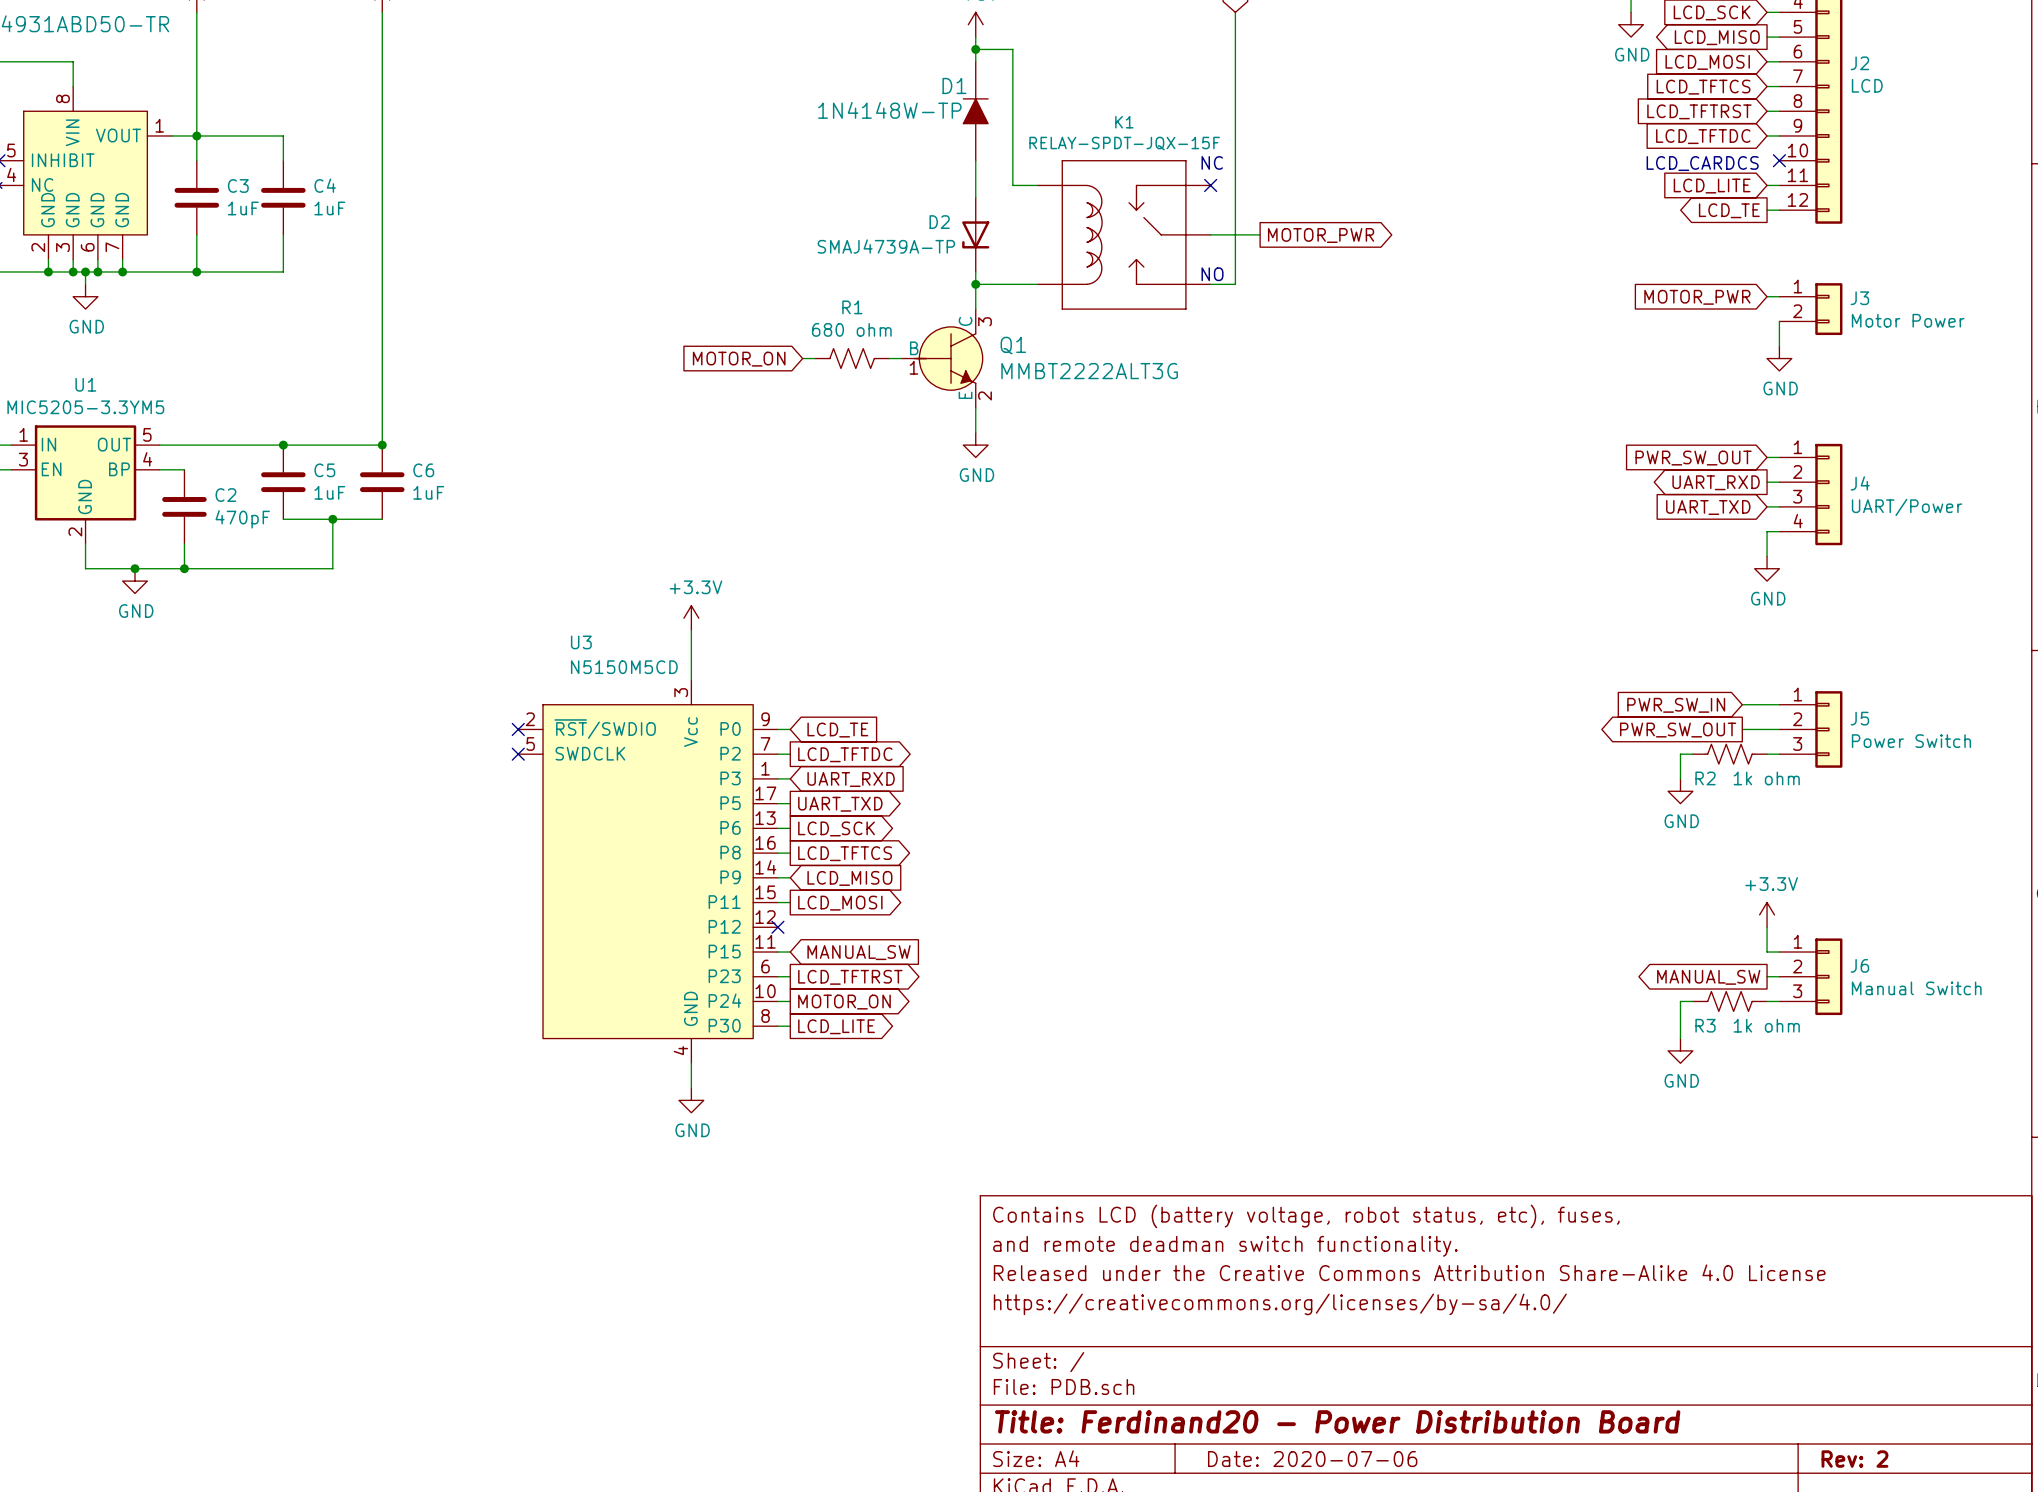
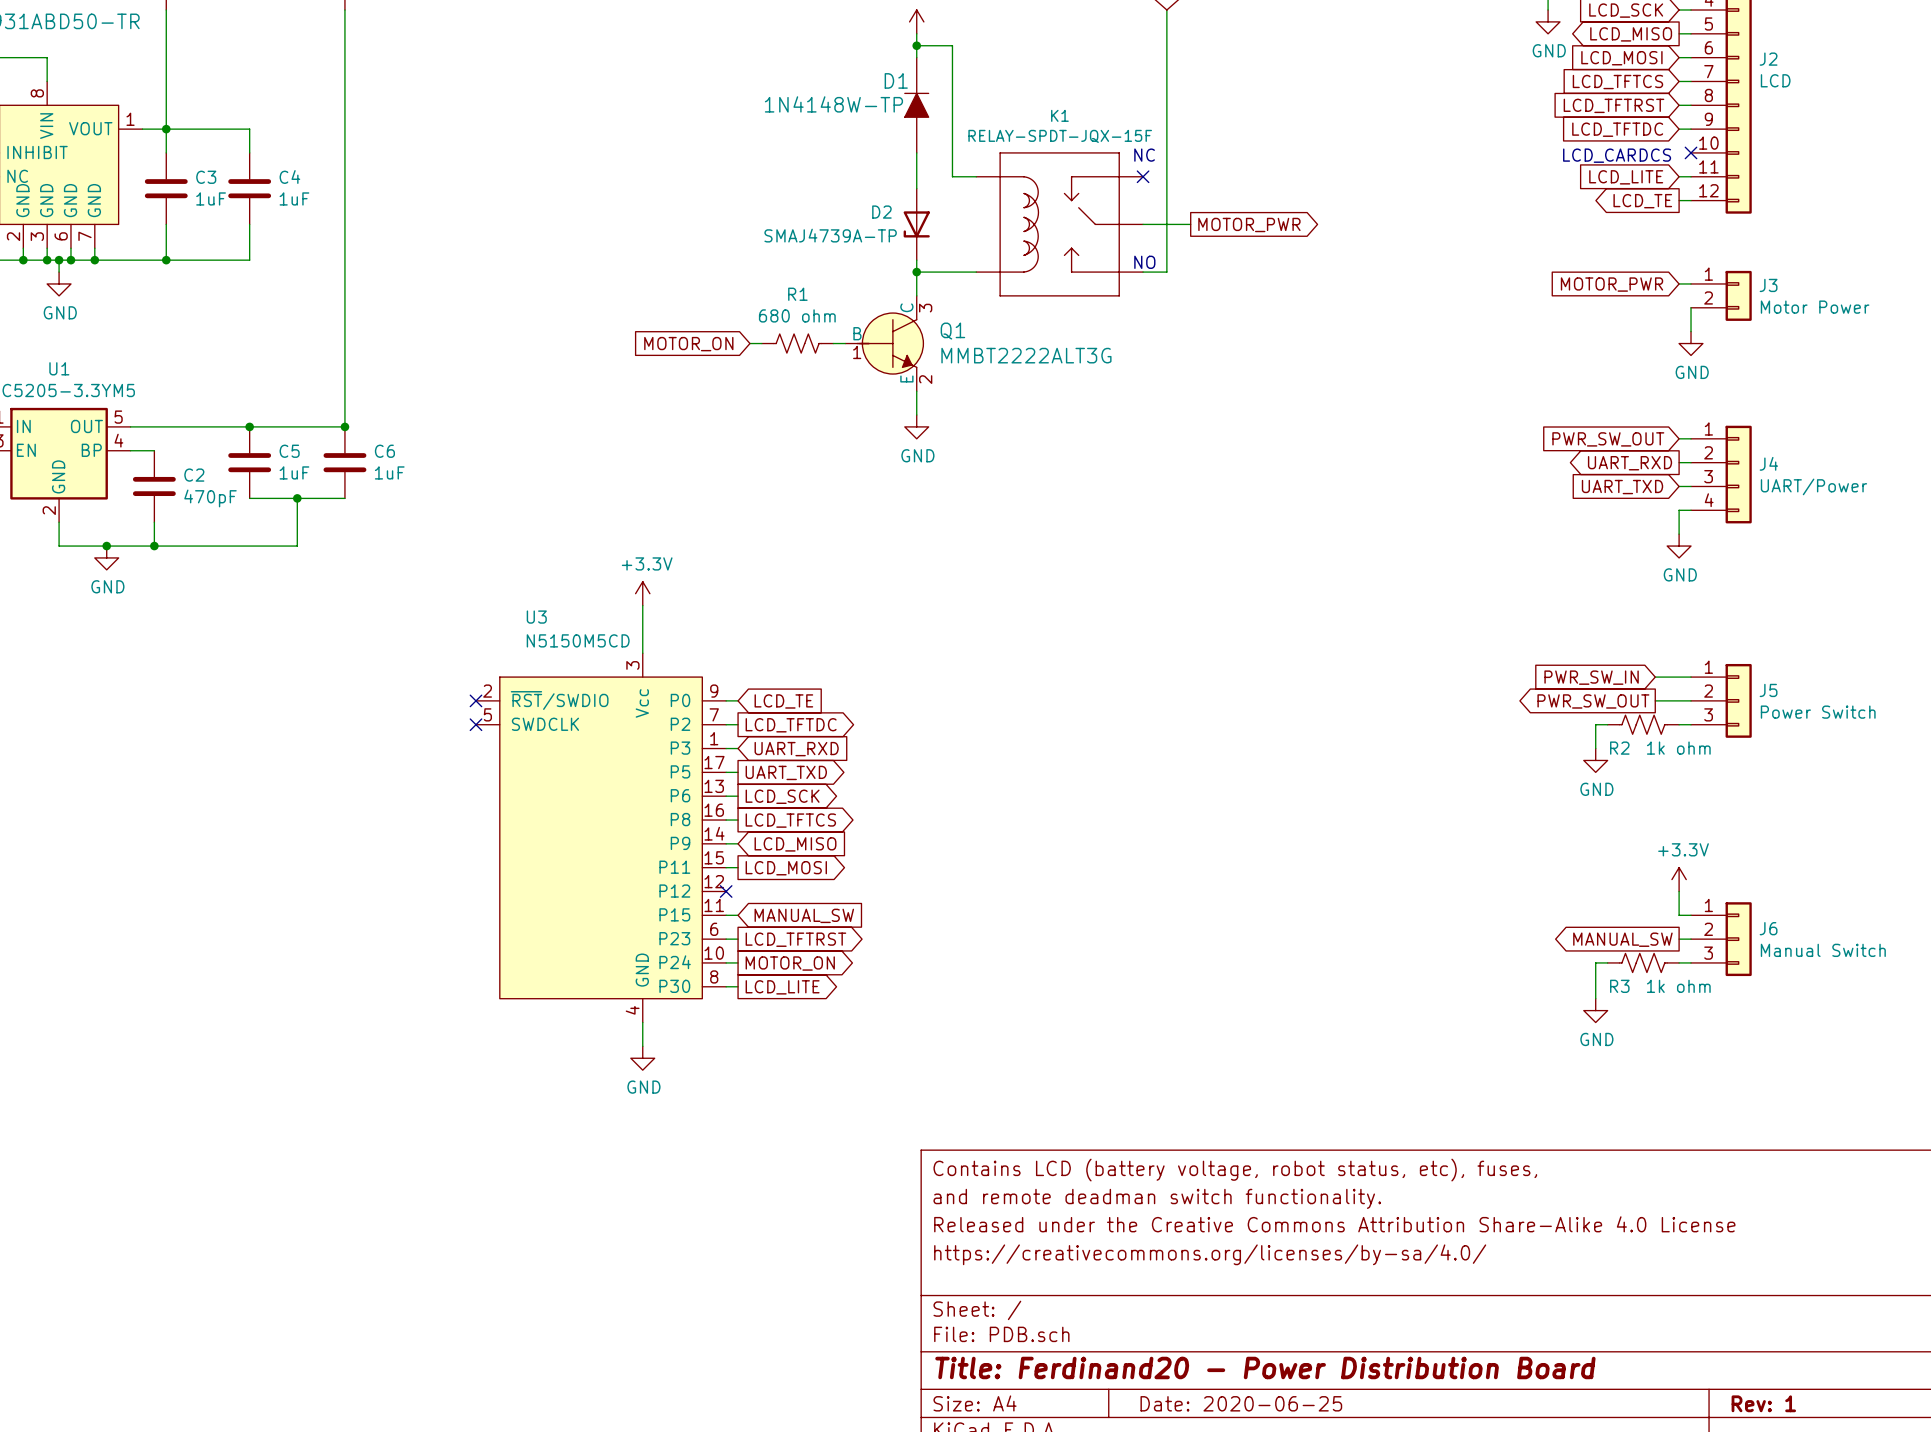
title block: Date: 2020-07-06 (1312, 1459) -> Date: 2020-06-25 (1241, 1403)
title block: Rev: 2 (1854, 1459) -> Rev: 1 (1763, 1403)

